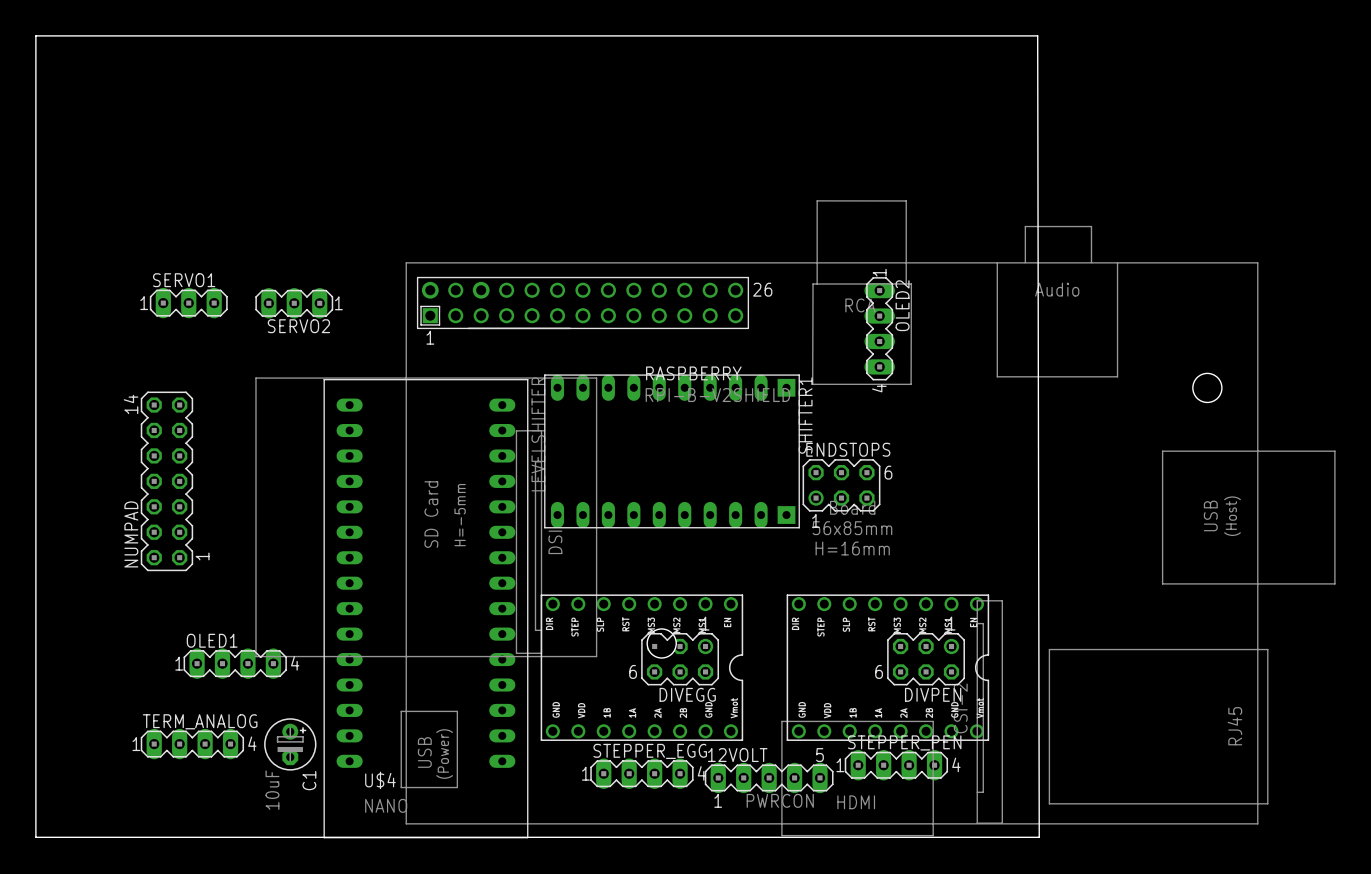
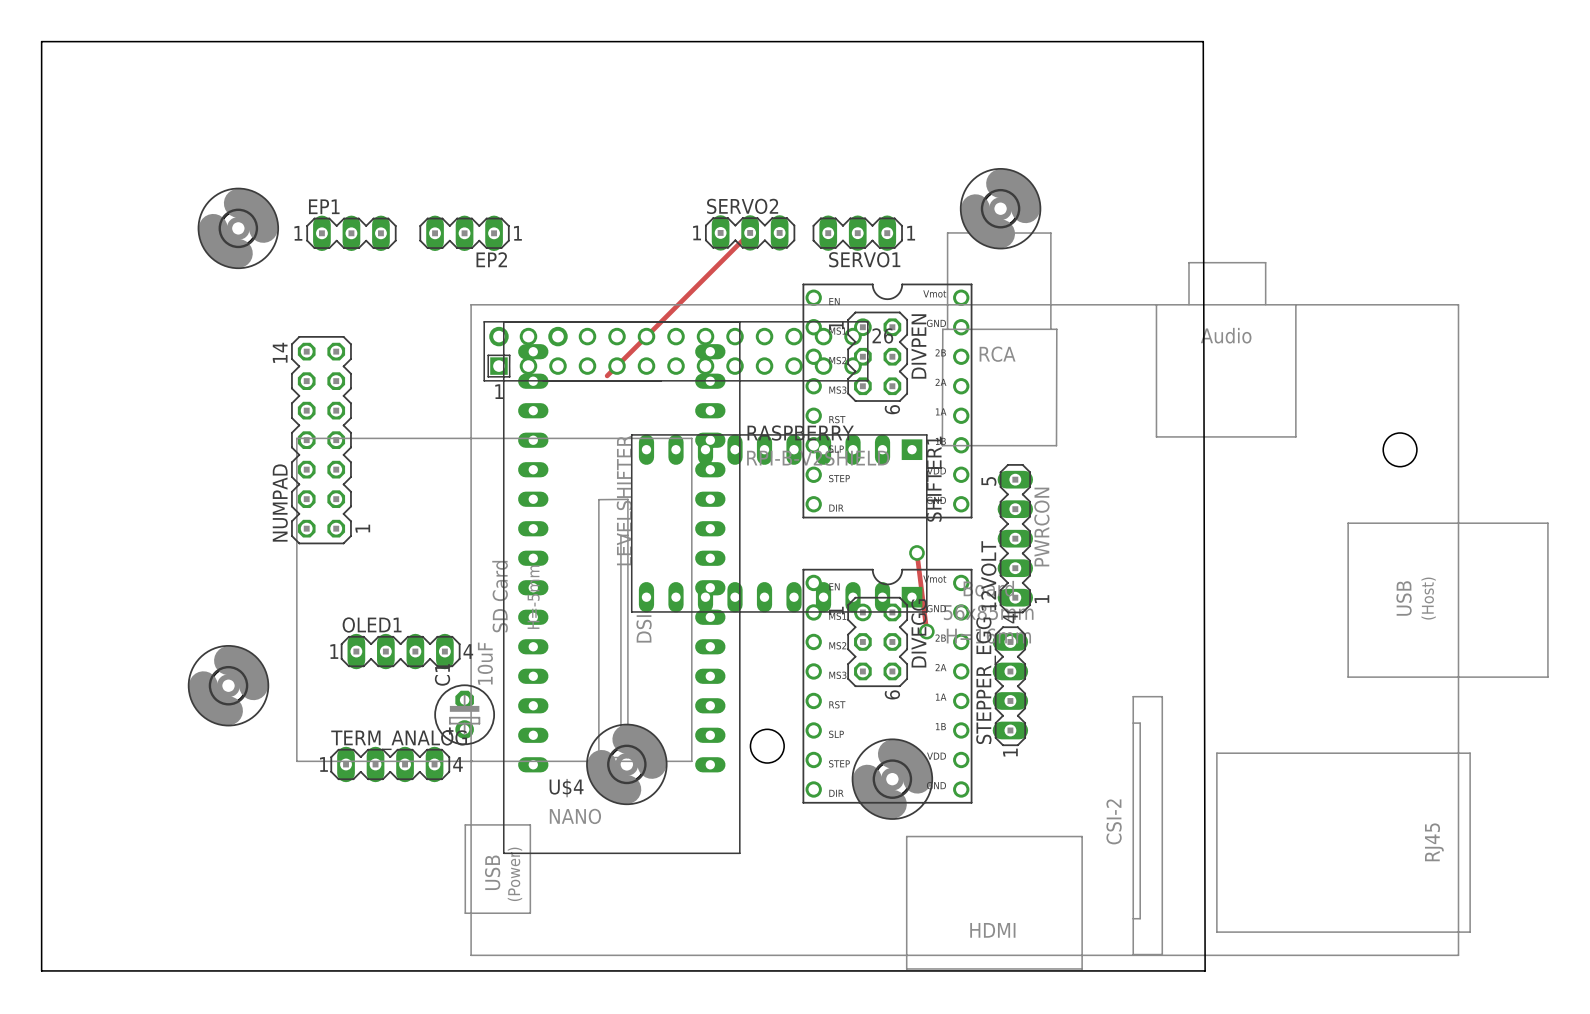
part: none -> (1000, 208)
part: none -> (238, 228)
track: none -> (750, 232) (607, 375)
EP1: none -> (351, 233)
EP2: none -> (464, 233)
SERVO1 name position: SERVO1 (184, 280) -> SERVO1 (864, 259)
SERVO1 text position: 1 (144, 303) -> 1 (911, 233)
SERVO1 position: (188, 303) -> (857, 233)
SERVO2 position: (294, 303) -> (750, 232)
SERVO2 text position: 1 (338, 303) -> 1 (697, 232)
DIVPEN: none -> (877, 356)
SERVO2 name position: SERVO2 (298, 326) -> SERVO2 (742, 206)
OLED2: (879, 328) -> none
part: none -> (887, 401)
track: none -> (916, 552) (926, 631)
via: none -> (916, 552)
NUMPAD position: (166, 481) -> (321, 440)
ENDSTOPS: (841, 485) -> none
via: none -> (926, 631)
part: none -> (228, 685)
part: none -> (887, 686)
STEPPER_EGG: none -> (1010, 686)
U$4 position: (425, 608) -> (621, 587)
part: none -> (626, 764)
DIVEGG rotation: 0° (680, 659) -> 90° counterclockwise (877, 641)
DIVEGG position: (680, 659) -> (877, 641)
DIVPEN: (926, 659) -> none
OLED1 position: (235, 663) -> (400, 651)
part: (641, 667) -> none
part: (887, 667) -> none
part: none -> (892, 779)
TERM_ANALOG position: (192, 744) -> (390, 764)
C1 rotation: 0° (290, 744) -> 180° (464, 714)
C1 position: (290, 744) -> (464, 714)
STEPPER_PEN: (896, 765) -> none
STEPPER_EGG: (641, 773) -> none
12VOLT rotation: 0° (769, 777) -> 90° counterclockwise (1015, 538)
12VOLT position: (769, 777) -> (1015, 538)

